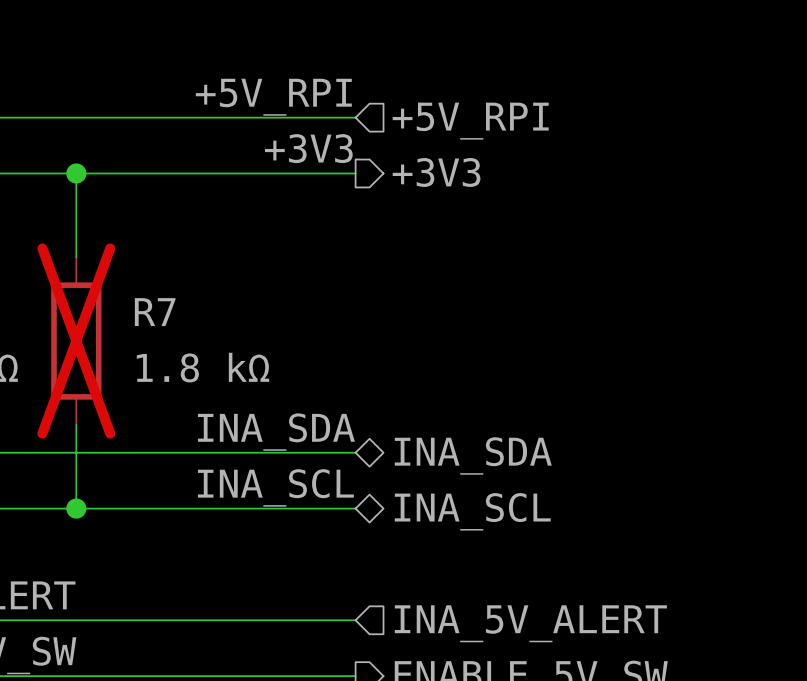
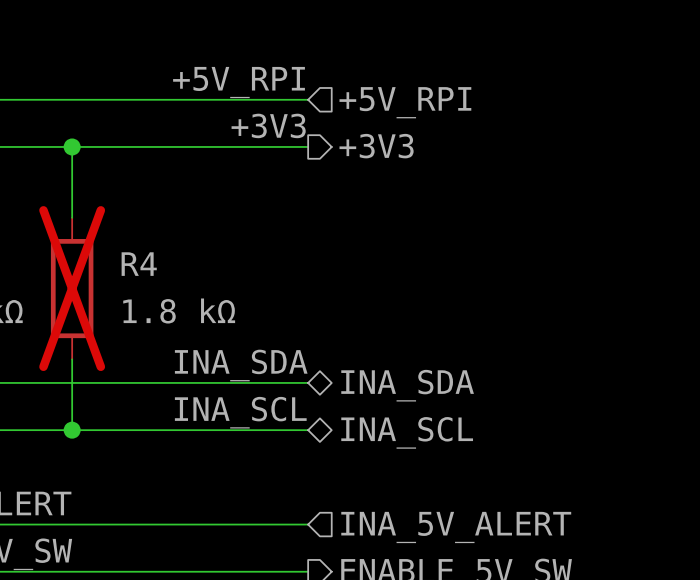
R7 name: R7 (155, 312) -> R4 (139, 264)

